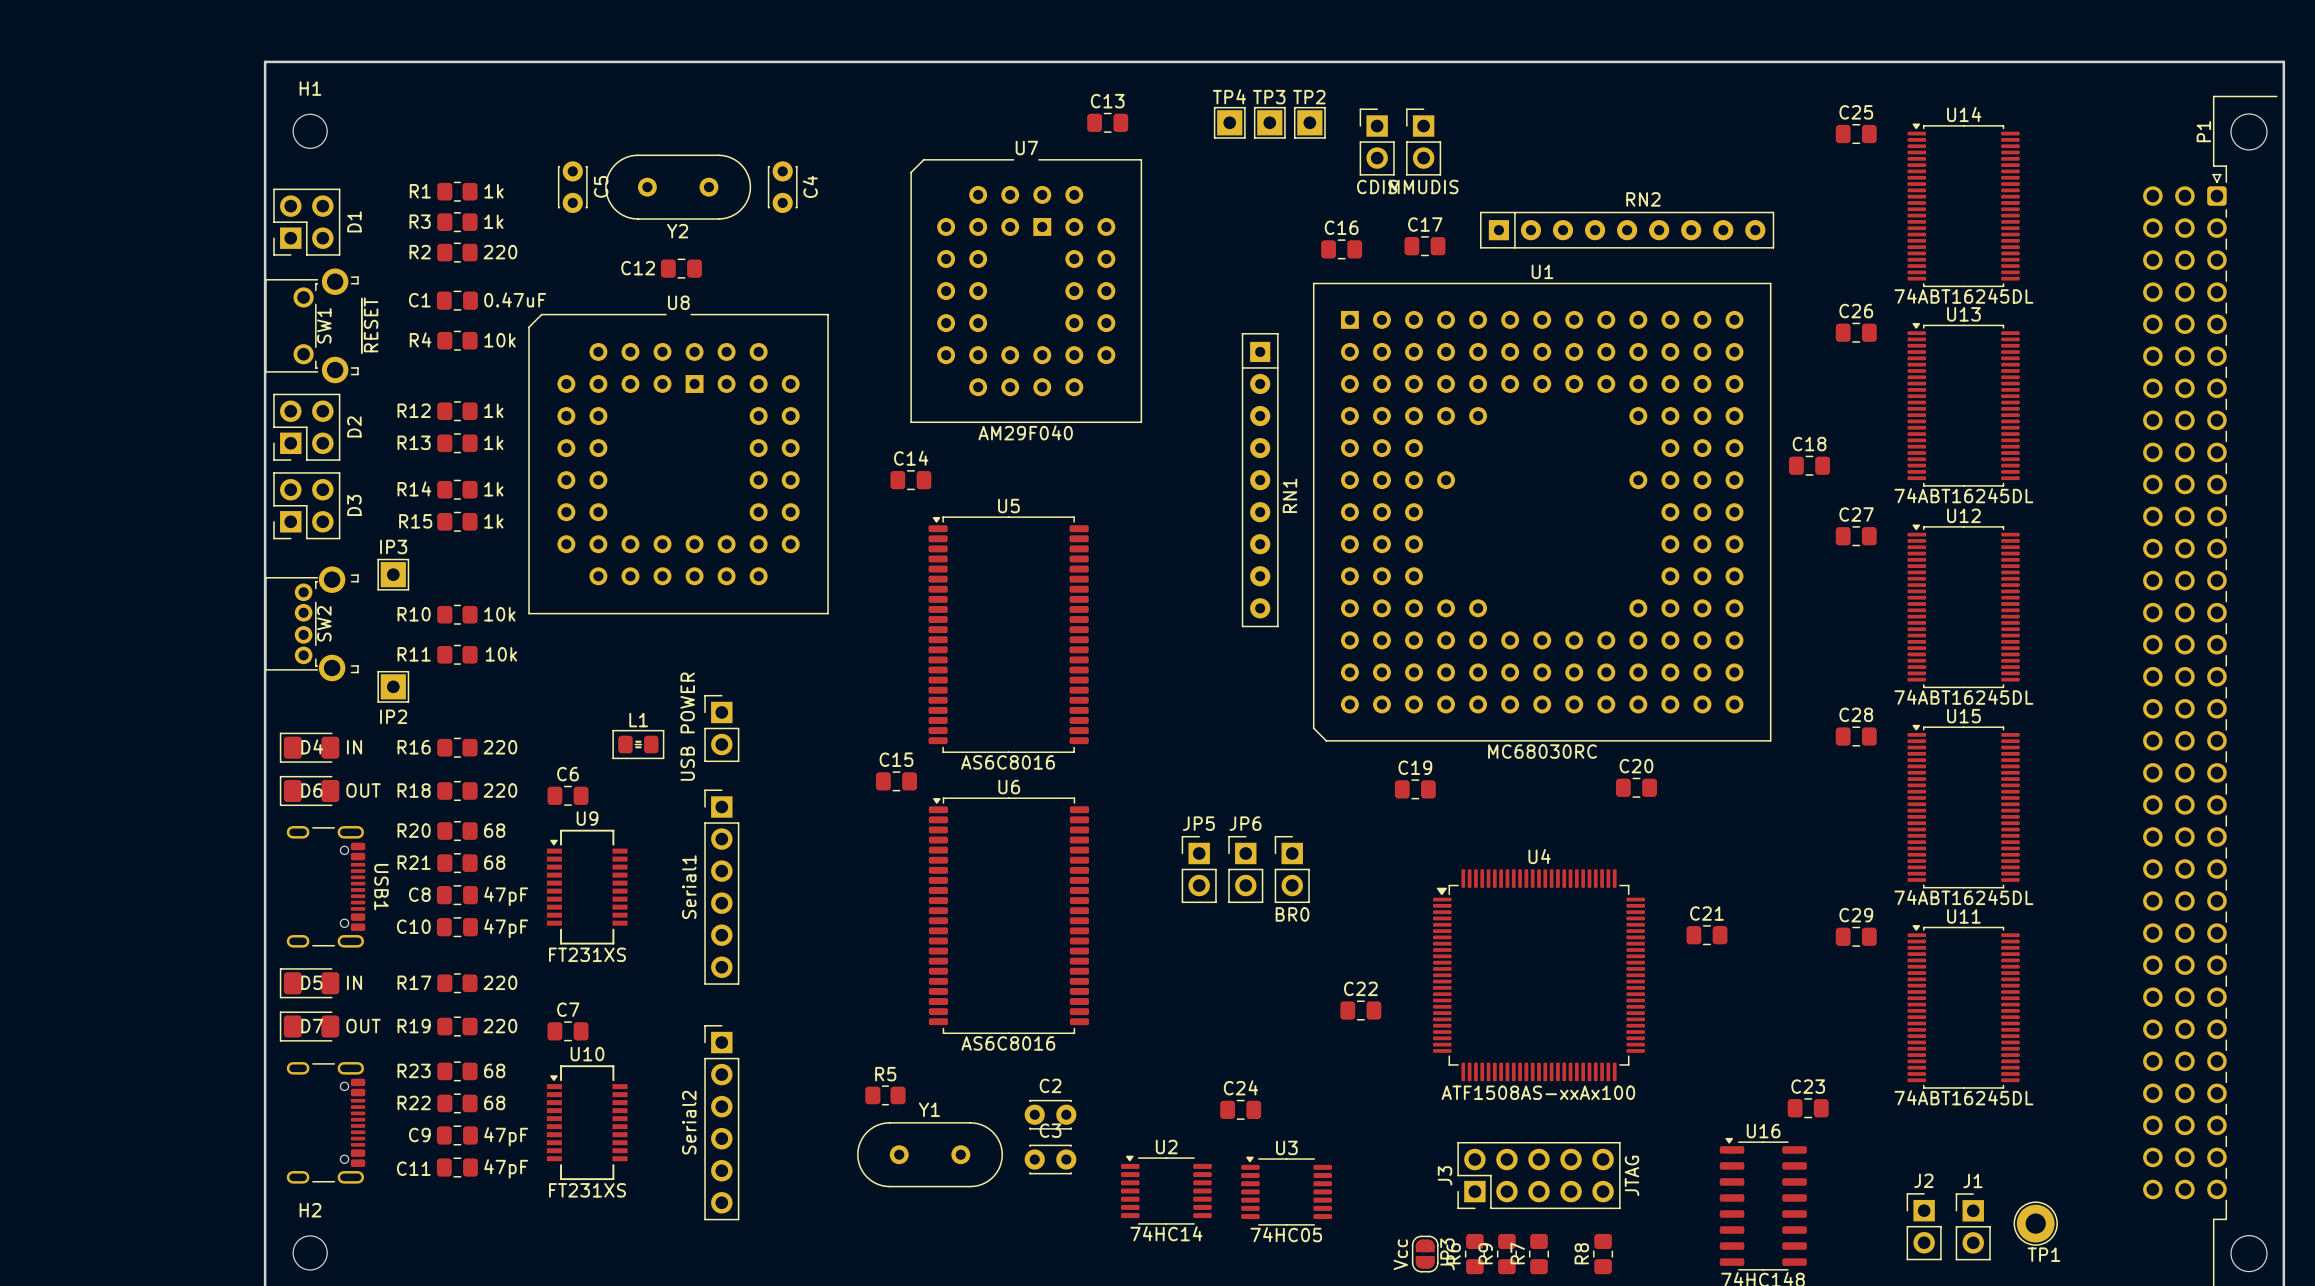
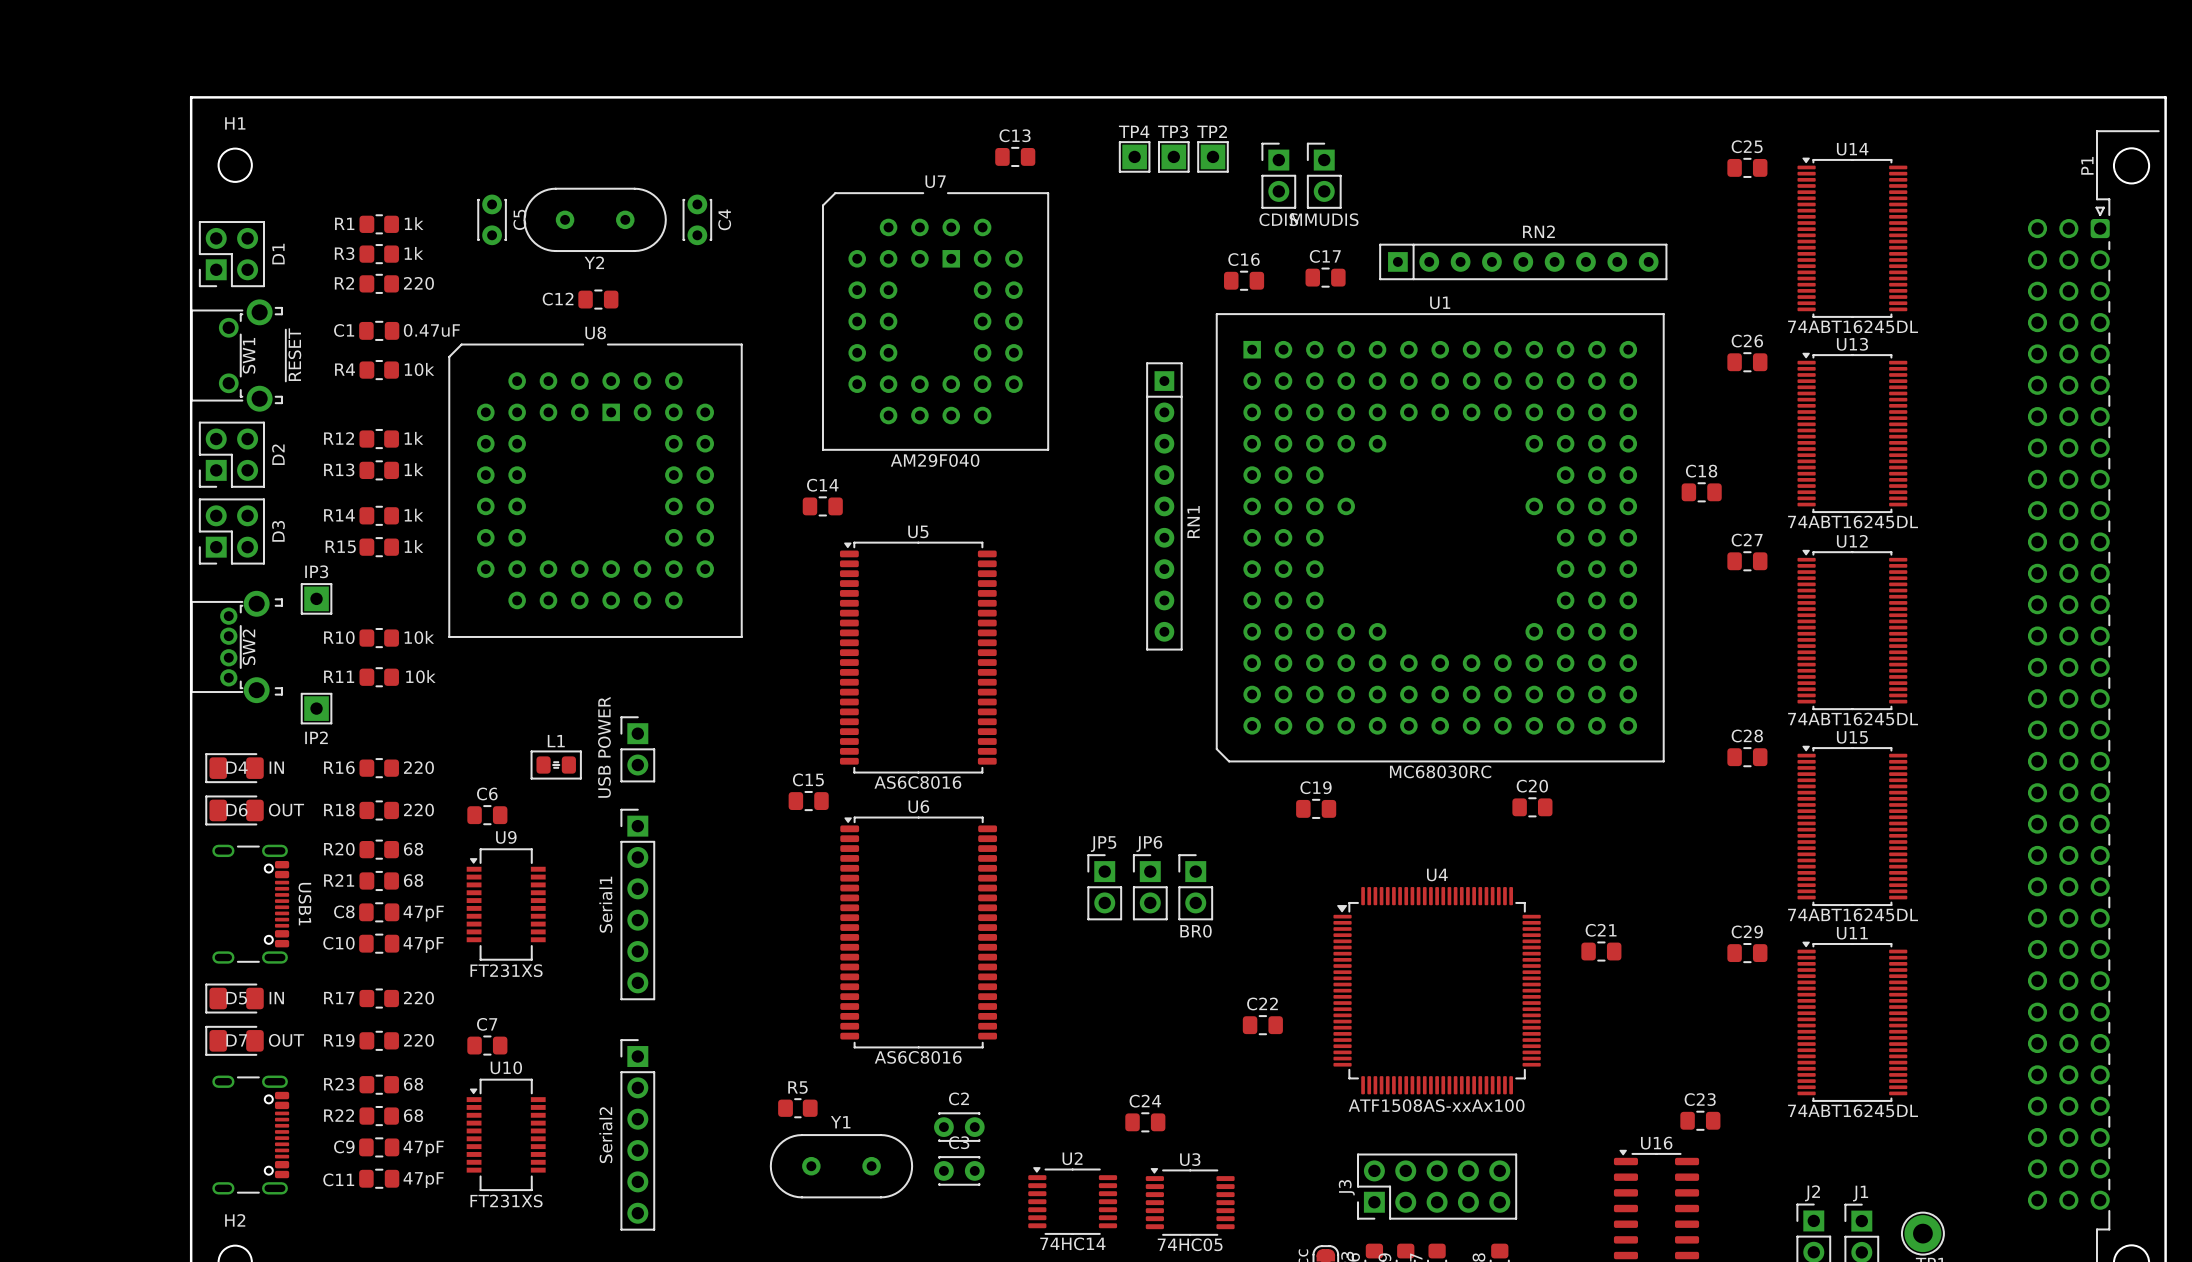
J3 value: JTAG (1632, 1175) -> none

